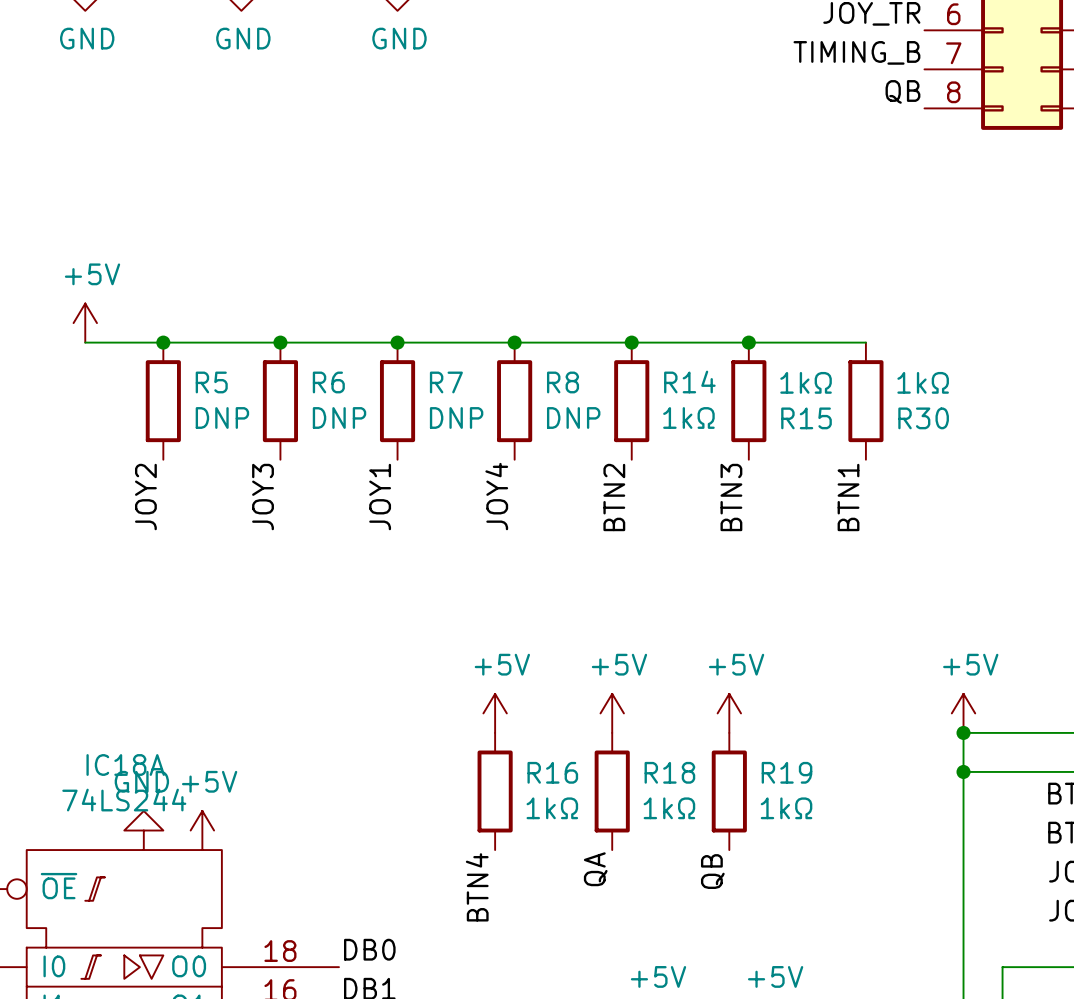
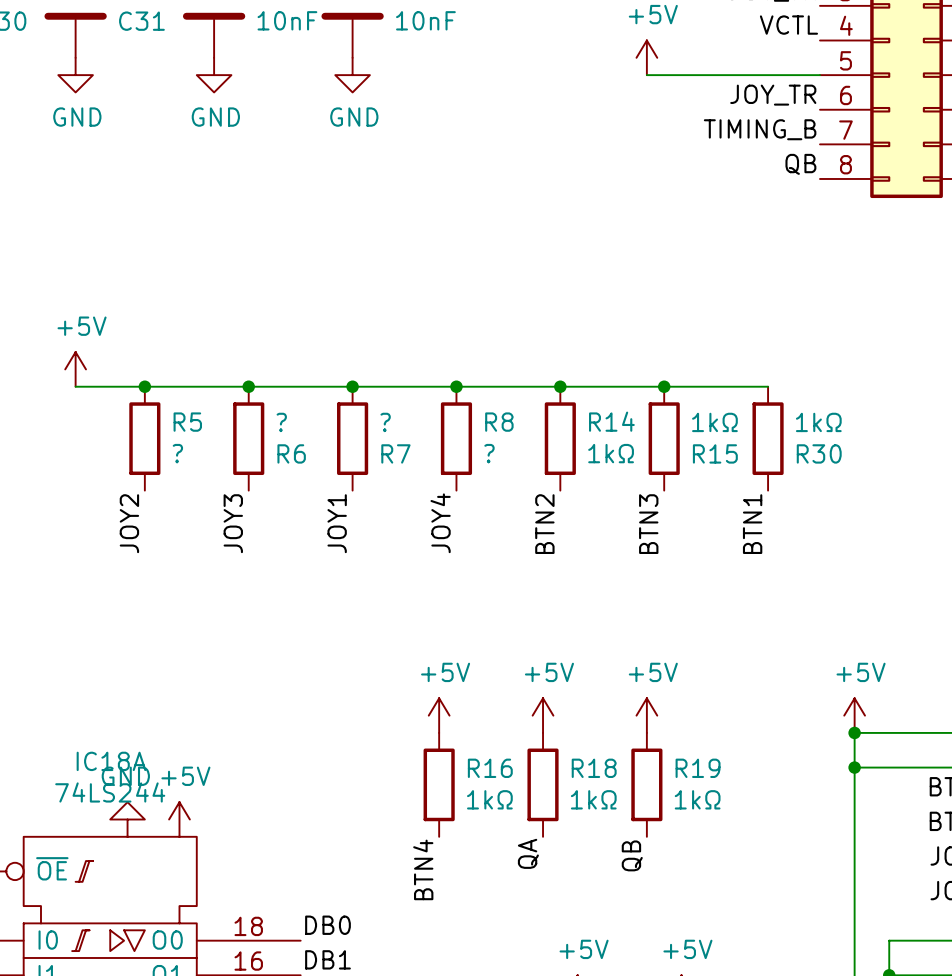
R6 name position: R6 (328, 382) -> R6 (291, 453)
R7 name position: R7 (446, 382) -> R7 (395, 453)
R5 value: DNP (222, 417) -> ? (177, 453)
R6 value: DNP (339, 417) -> ? (281, 422)
R7 value: DNP (456, 417) -> ? (385, 422)
R8 value: DNP (573, 417) -> ? (489, 453)

